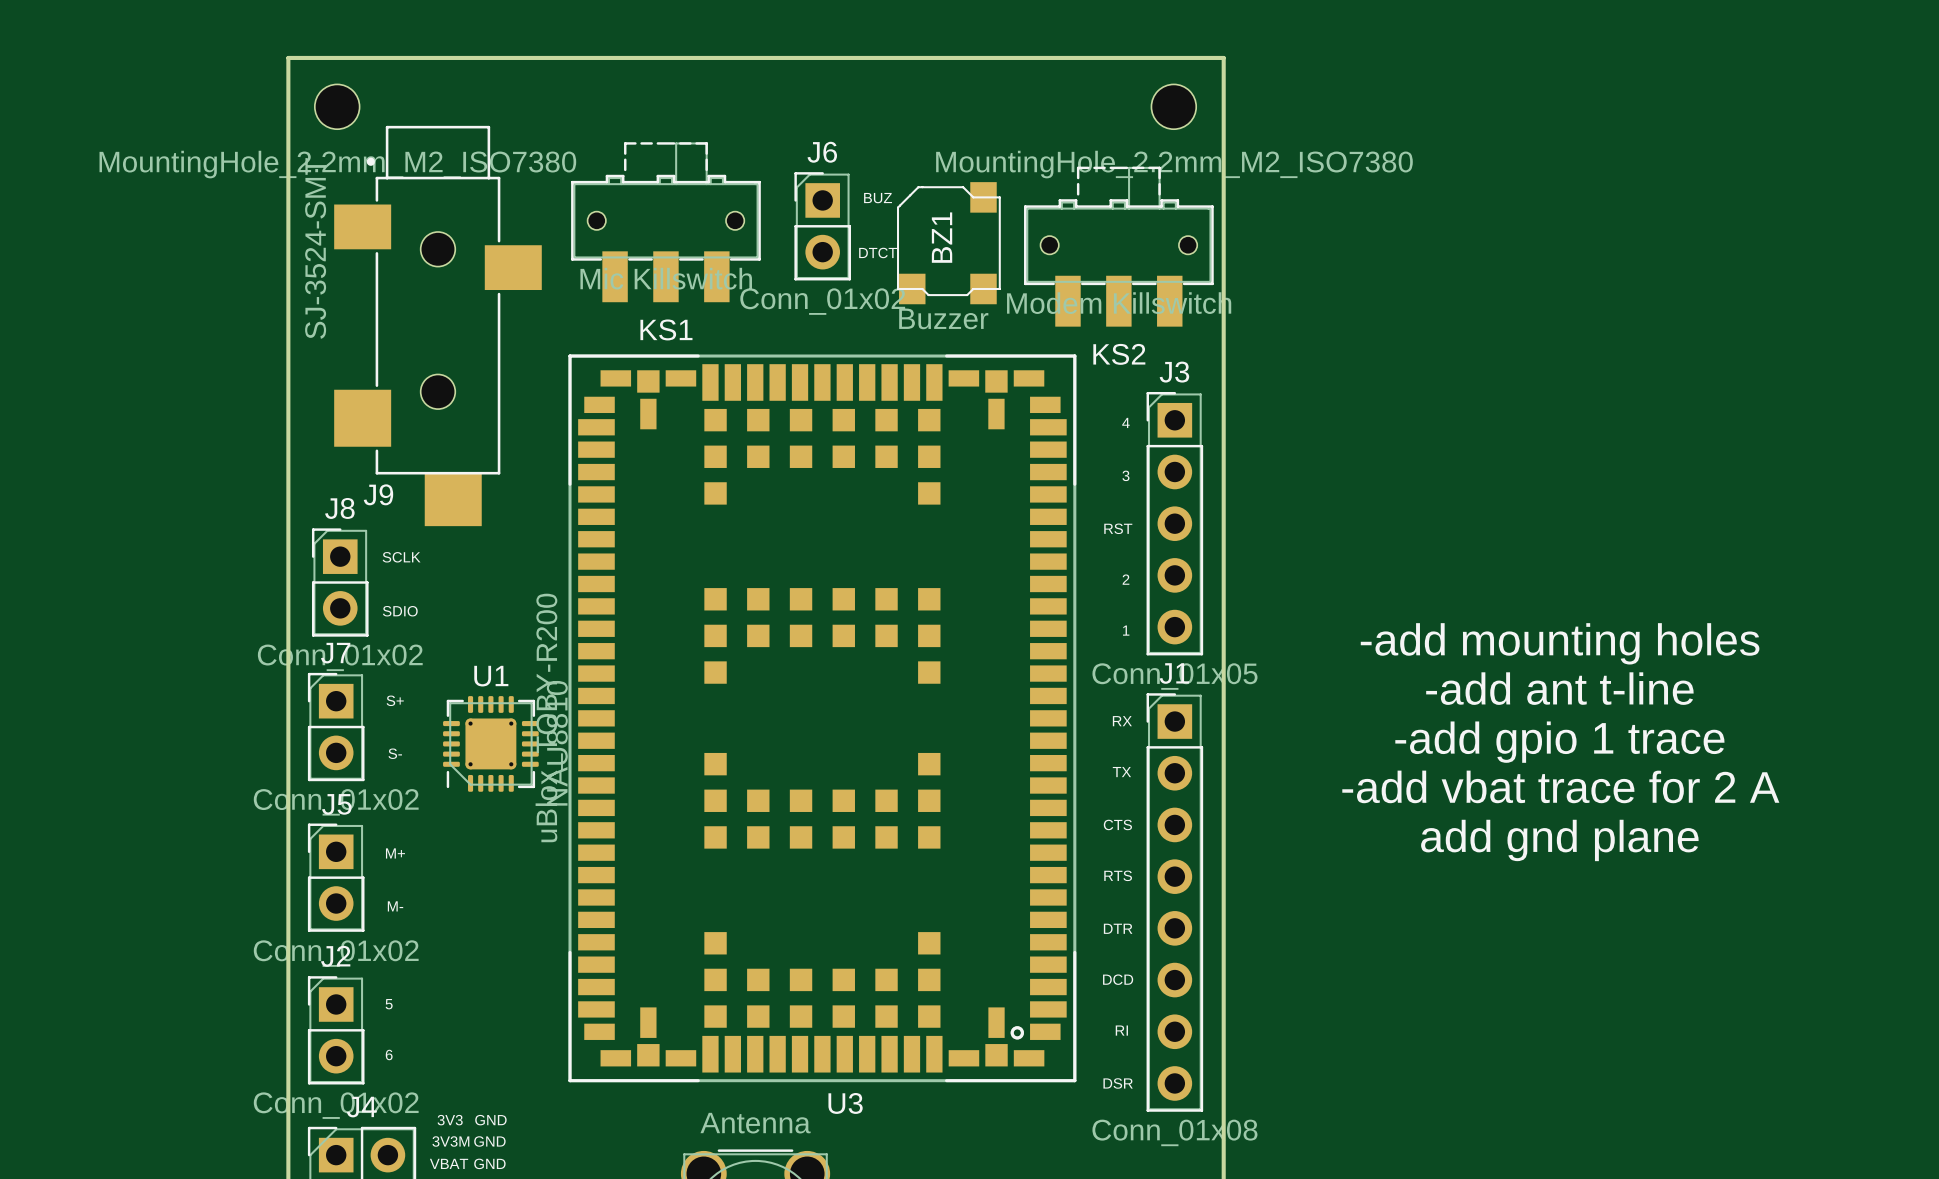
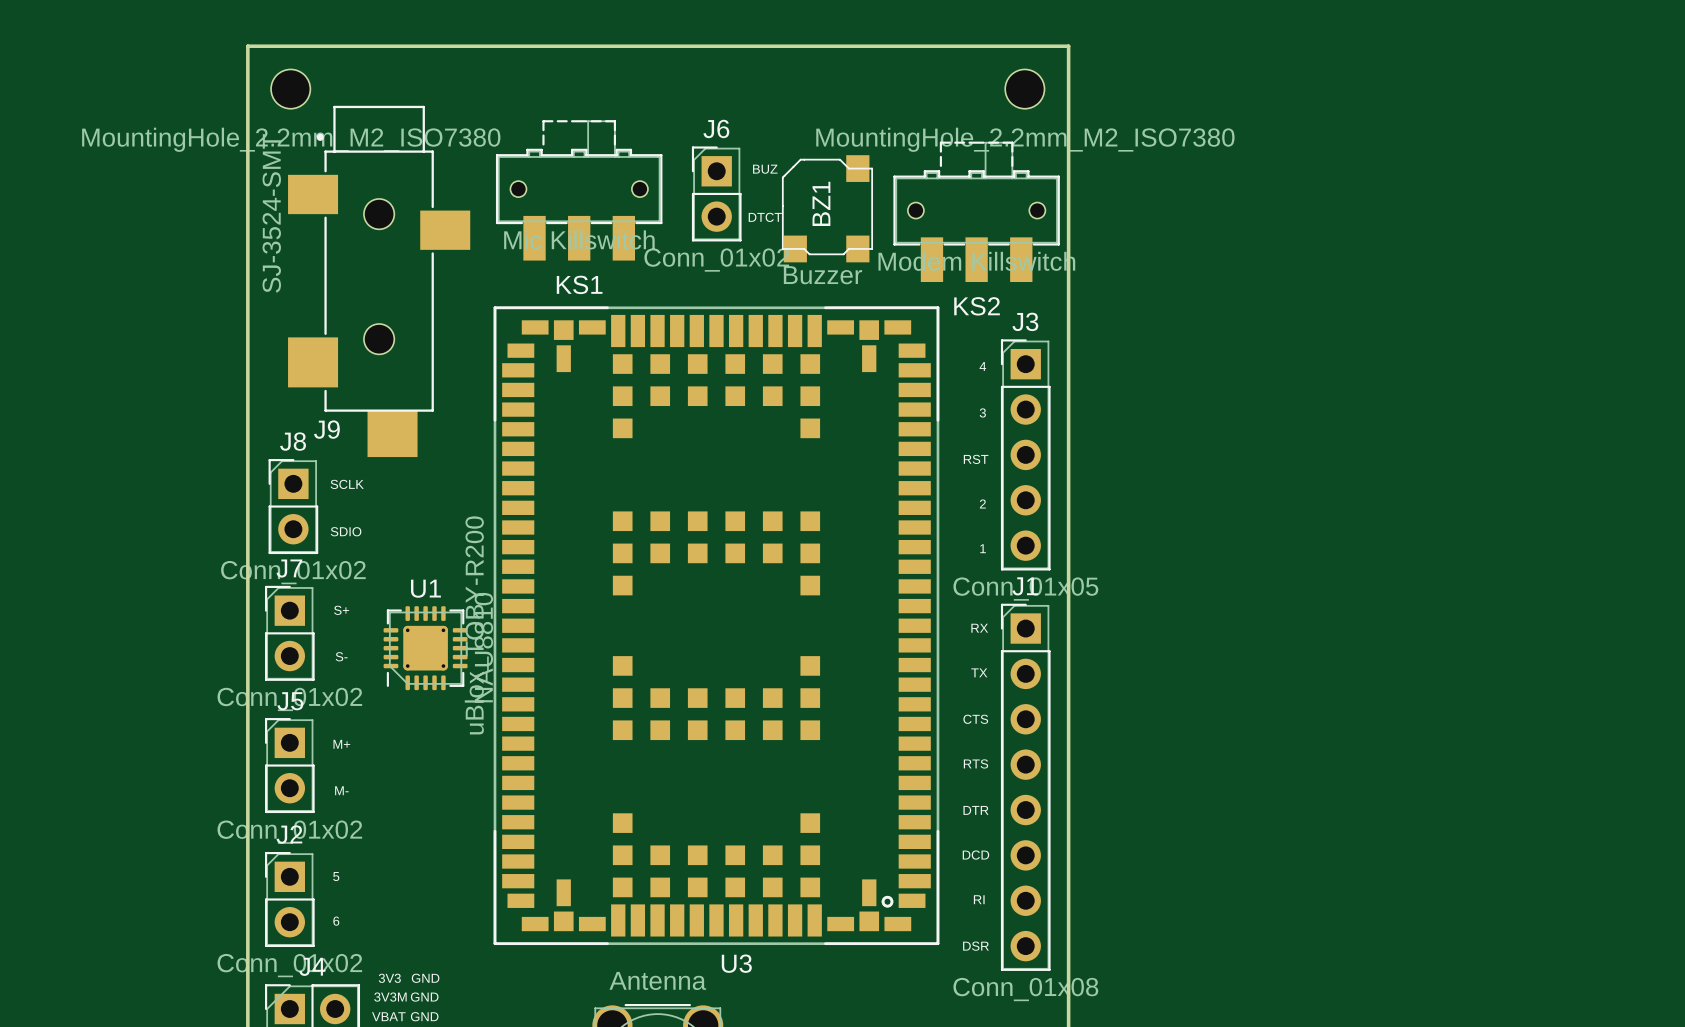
text: -add mounting holes (1560, 643) -> none
text: -add ant t-line (1559, 688) -> none
text: -add gpio 1 trace (1559, 742) -> none
text: -add vbat trace for 2 A (1560, 786) -> none
text: add gnd plane (1559, 840) -> none

